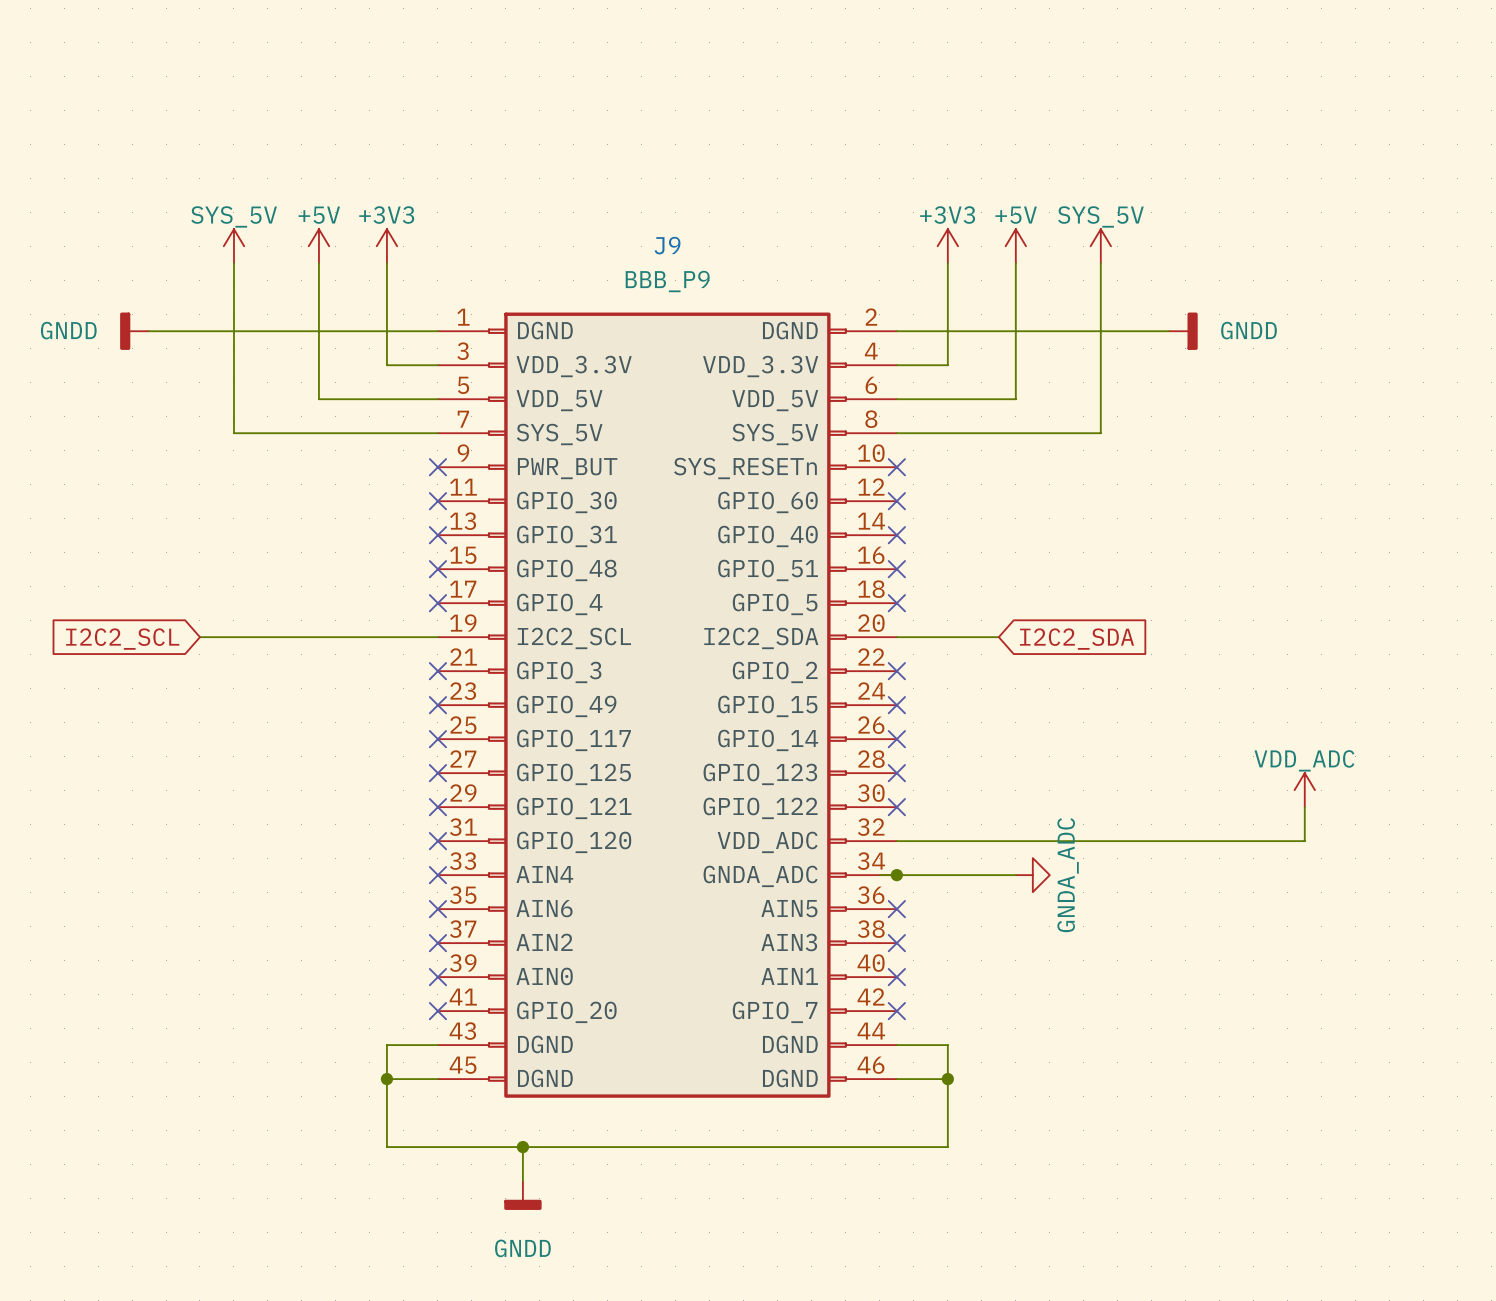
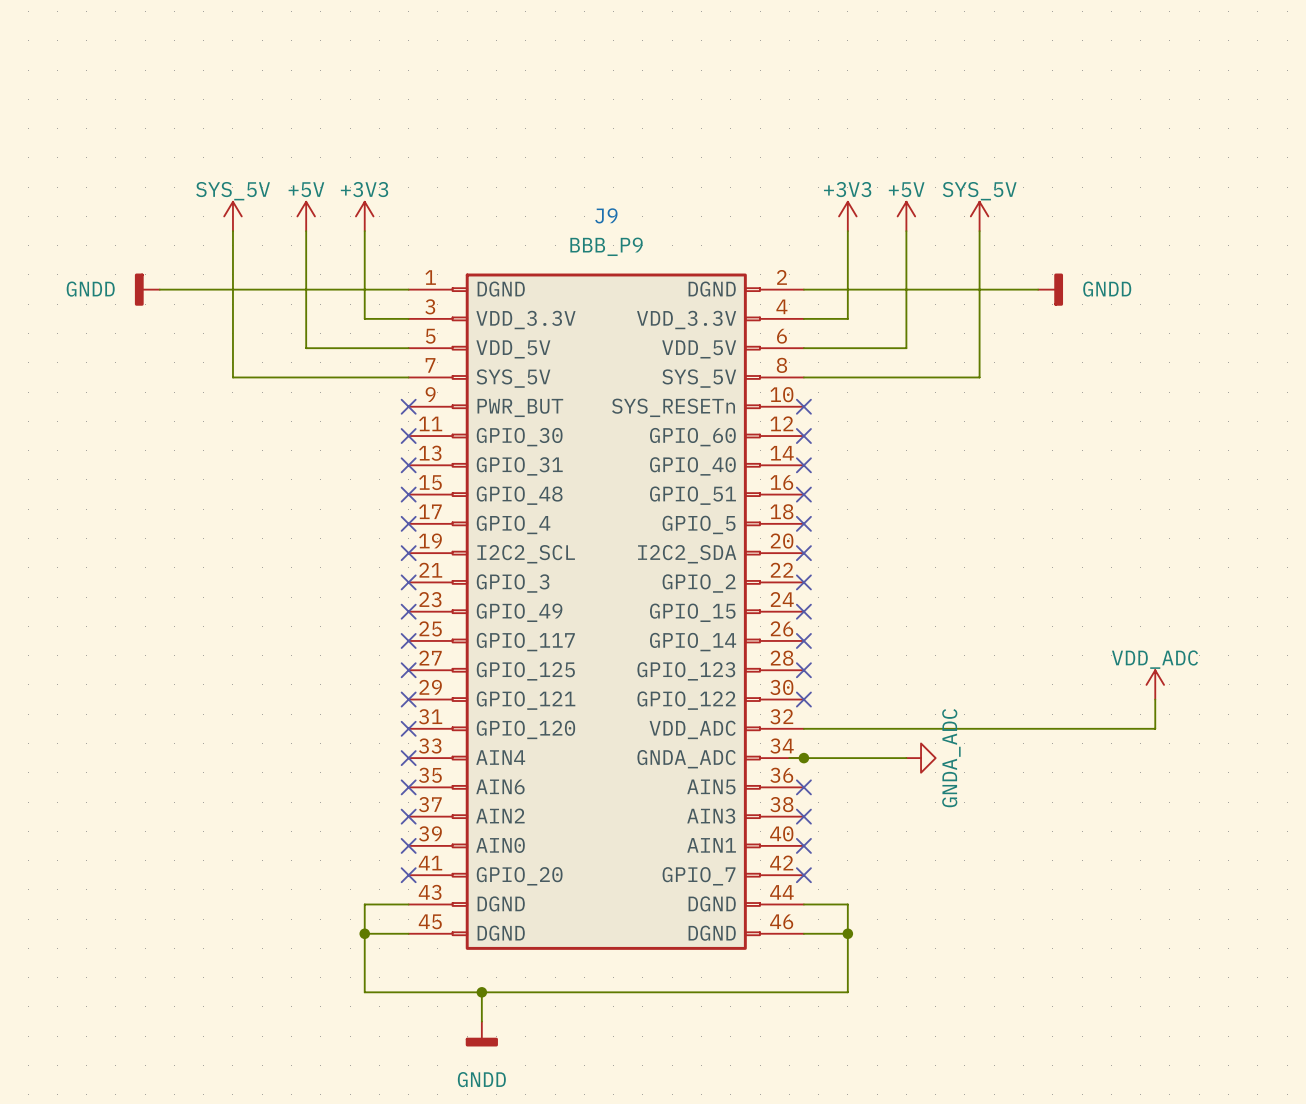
wire: (199, 637) (437, 637) -> none
no-connect mark: none -> (408, 553)
wire: (896, 637) (998, 637) -> none
no-connect mark: none -> (803, 553)
global label: I2C2_SCL (122, 639) -> none
global label: I2C2_SDA (1077, 639) -> none

